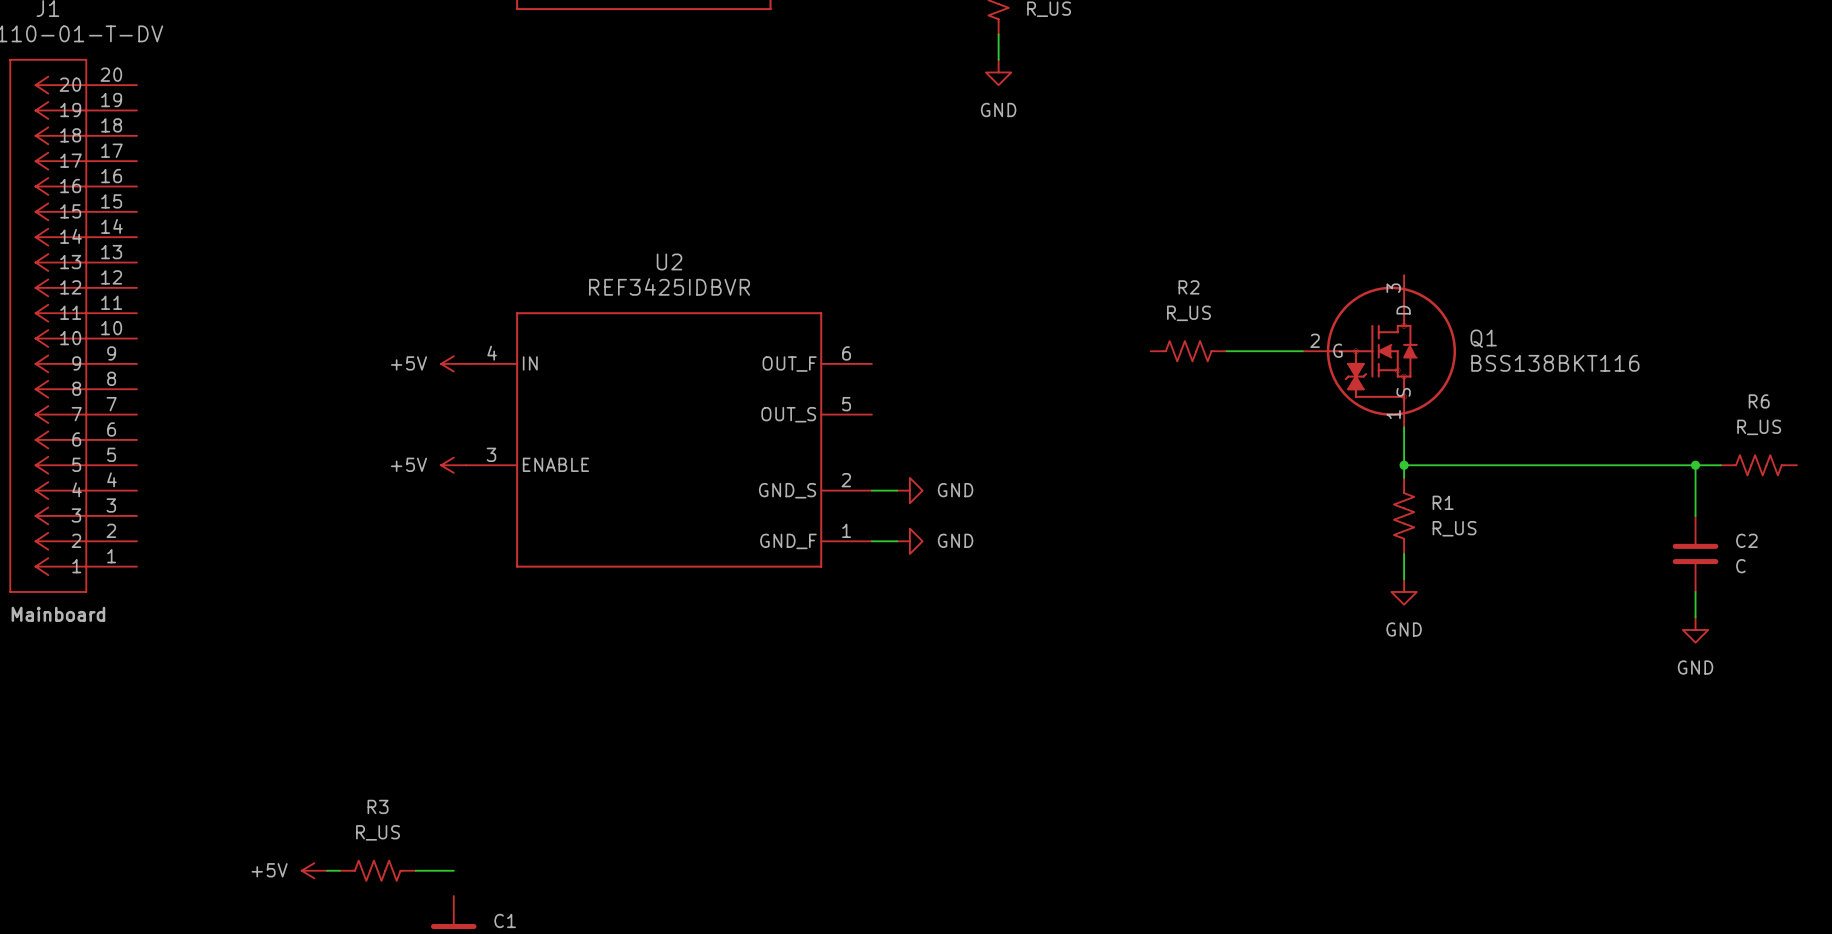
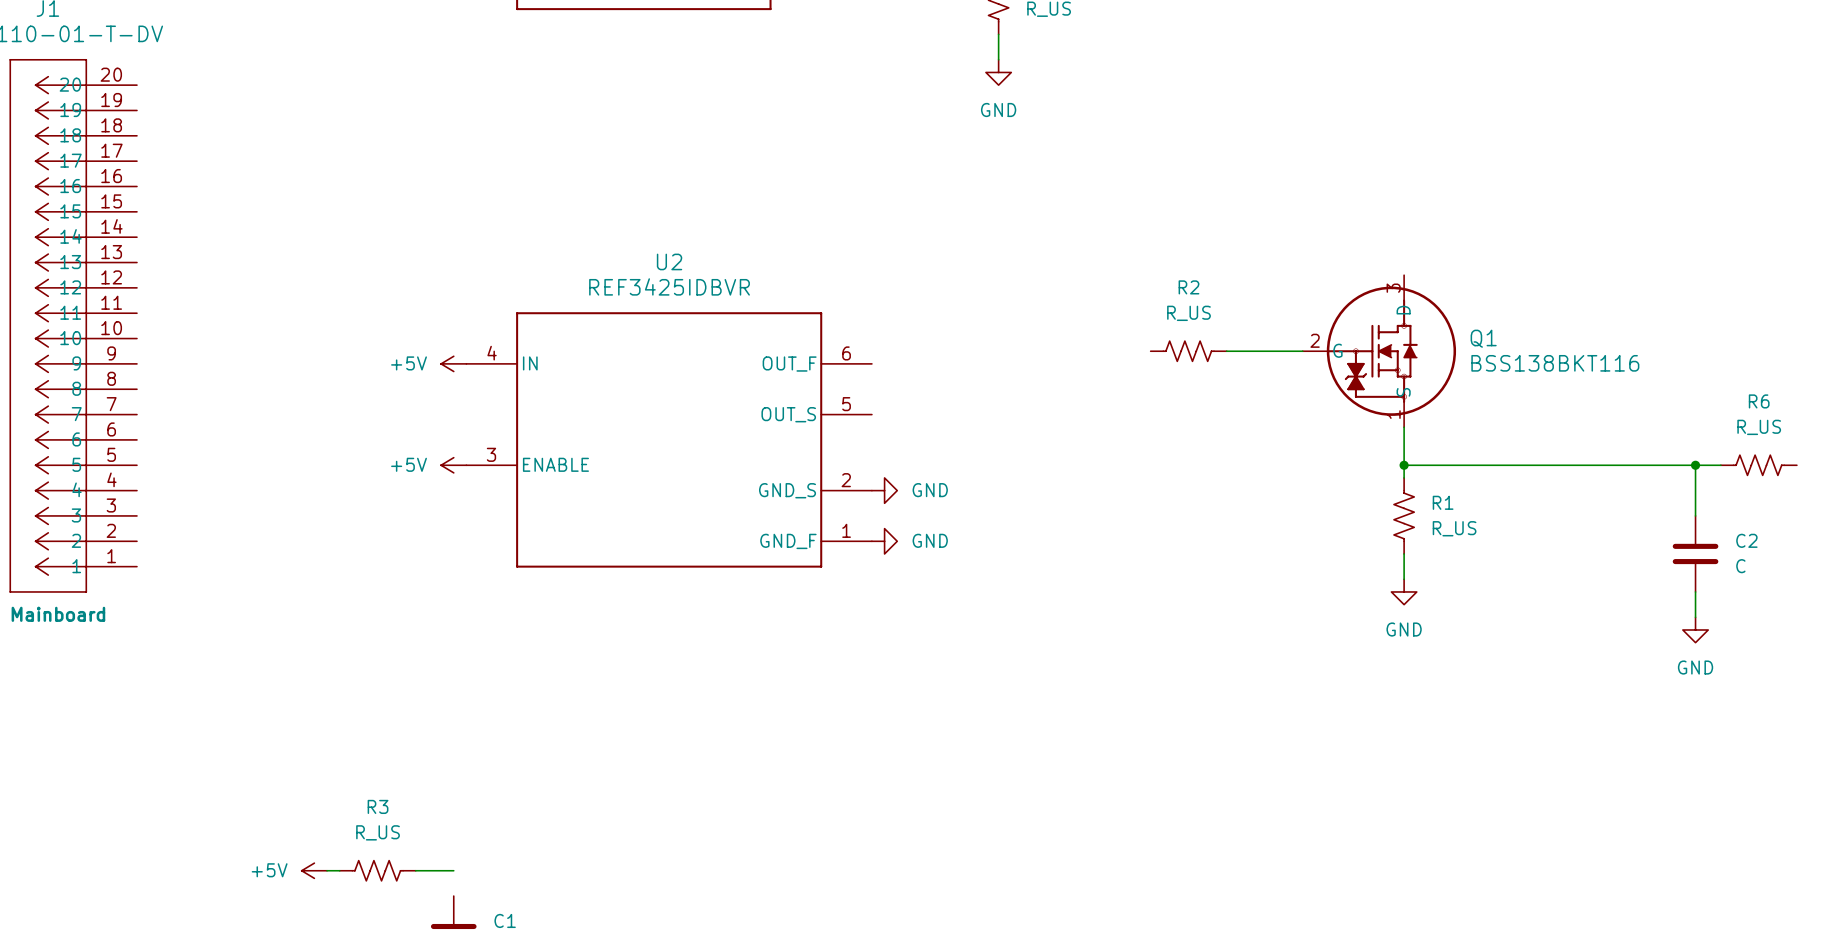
power symbol position: GND (909, 490) -> GND (884, 490)
power symbol position: GND (909, 541) -> GND (884, 541)

